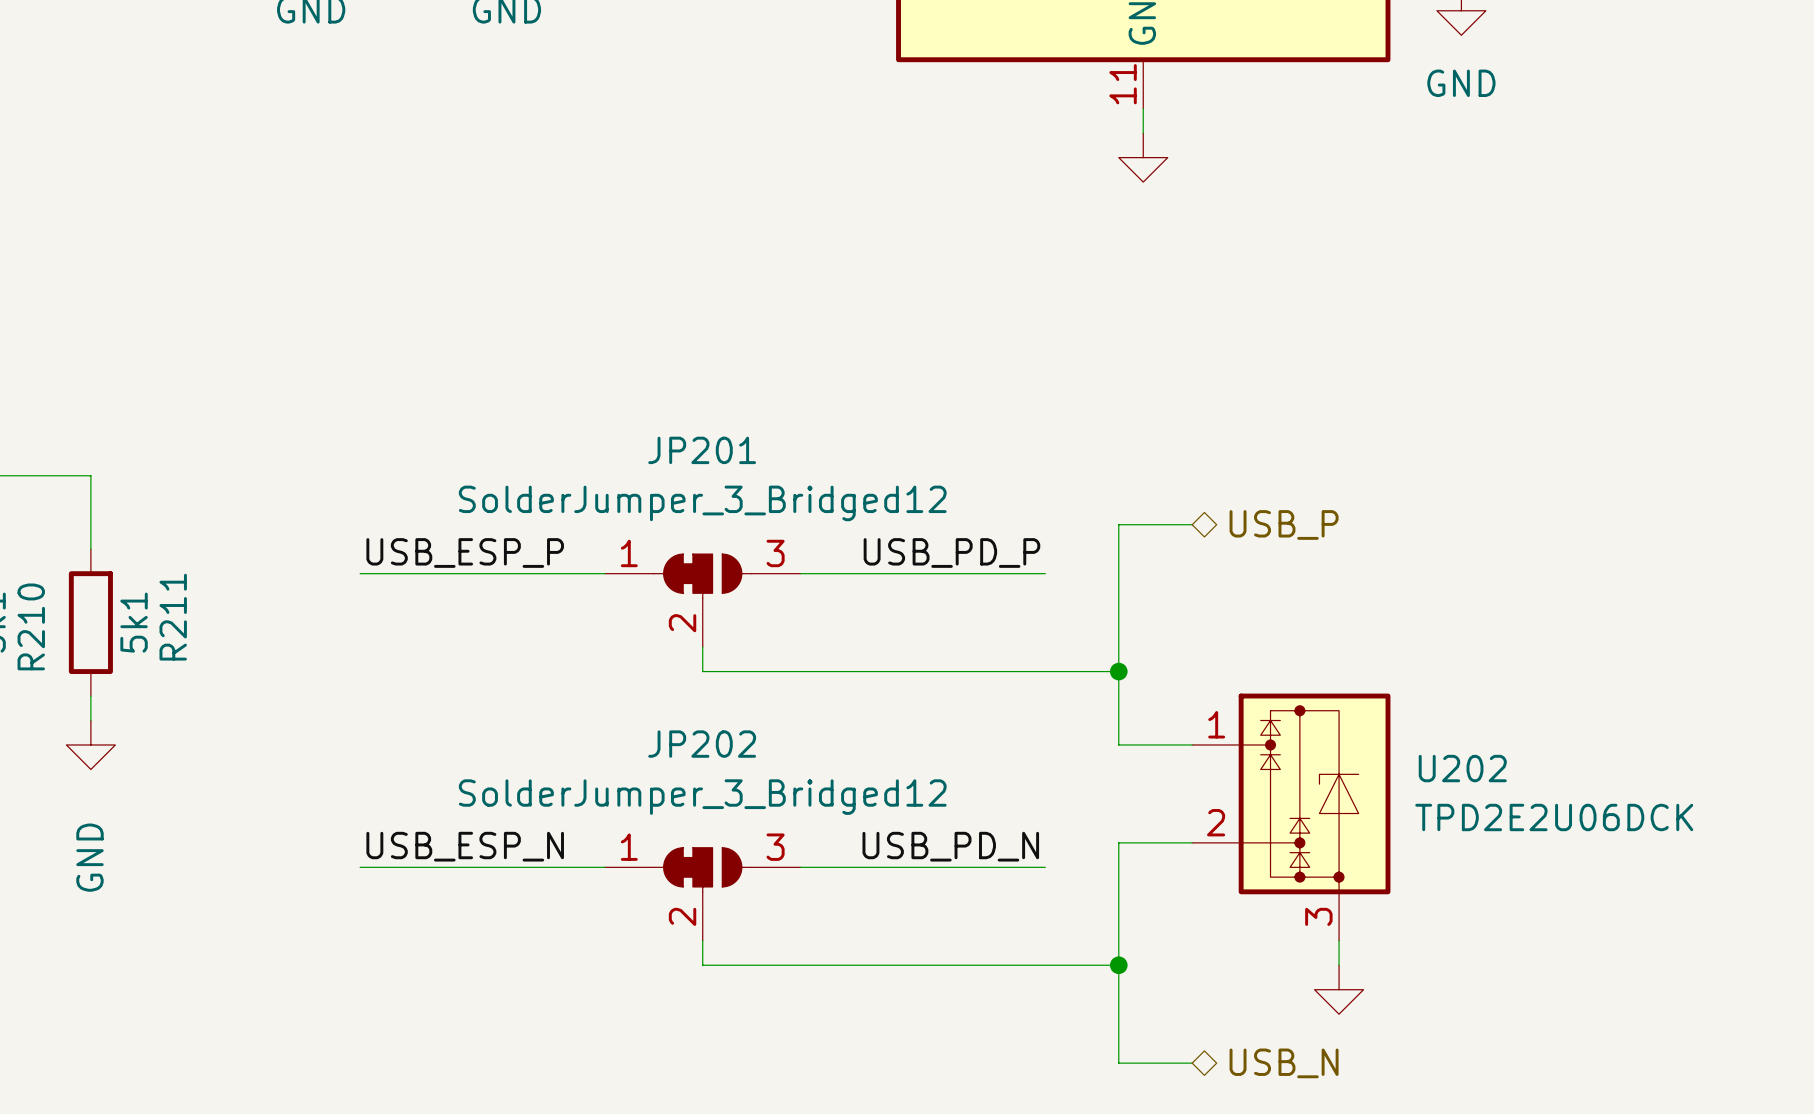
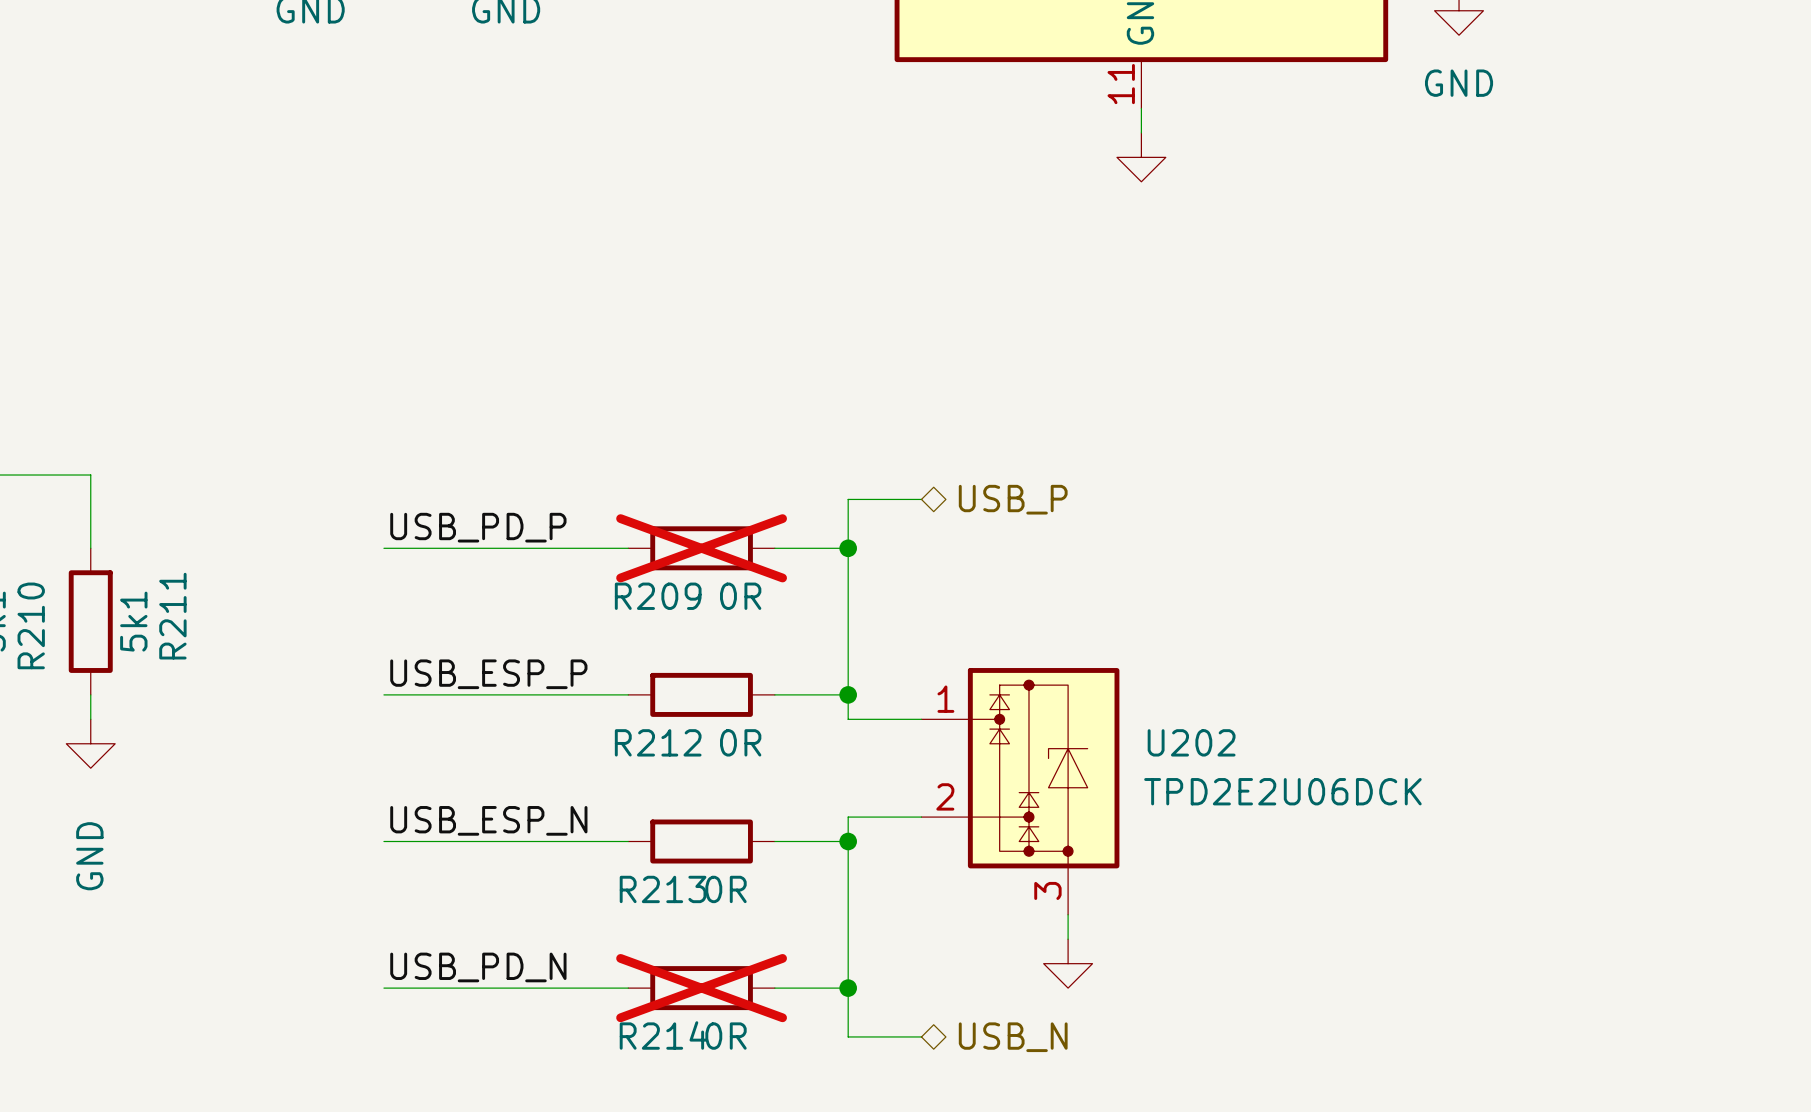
wire: (1192, 524) (1118, 524) (1118, 744) (1192, 744) -> (921, 499) (848, 499) (848, 719) (921, 719)
hierarchical label position: USB_P (1284, 524) -> USB_P (1013, 499)
label: none -> USB_PD_P (478, 527)
R209: none -> 0R (701, 548)
wire: none -> (774, 548) (848, 548)
junction: none -> (848, 548)
label position: USB_ESP_P (465, 553) -> USB_ESP_P (488, 674)
label: USB_PD_P (951, 553) -> none
wire: (360, 573) (604, 573) -> (383, 548) (628, 548)
wire: (800, 573) (1045, 573) -> (383, 694) (628, 694)
JP201: SolderJumper_3_Bridged12 (702, 600) -> none
wire: (702, 647) (702, 671) (1118, 671) -> none
junction: (1118, 671) -> none
R212: none -> 0R (701, 694)
wire: none -> (774, 694) (848, 694)
junction: none -> (848, 694)
U202 position: (1291, 817) -> (1020, 791)
R213: none -> 0R (701, 841)
wire: none -> (774, 841) (848, 841)
junction: none -> (848, 841)
wire: (1192, 842) (1118, 842) (1118, 1063) (1192, 1063) -> (921, 817) (848, 817) (848, 1036) (921, 1036)
label position: USB_ESP_N (465, 846) -> USB_ESP_N (488, 820)
label: USB_PD_N (950, 846) -> none
wire: (360, 867) (604, 867) -> (383, 841) (628, 841)
wire: (800, 867) (1045, 867) -> (383, 988) (628, 988)
JP202: SolderJumper_3_Bridged12 (702, 894) -> none
wire: (702, 940) (702, 965) (1118, 965) -> none
wire: (1339, 940) (1339, 965) -> (1068, 914) (1068, 939)
junction: (1118, 965) -> none
label: none -> USB_PD_N (478, 967)
R214: none -> 0R (701, 988)
wire: none -> (774, 988) (848, 988)
junction: none -> (848, 988)
power symbol position: (1339, 989) -> (1068, 963)
hierarchical label position: USB_N (1284, 1063) -> USB_N (1013, 1037)

